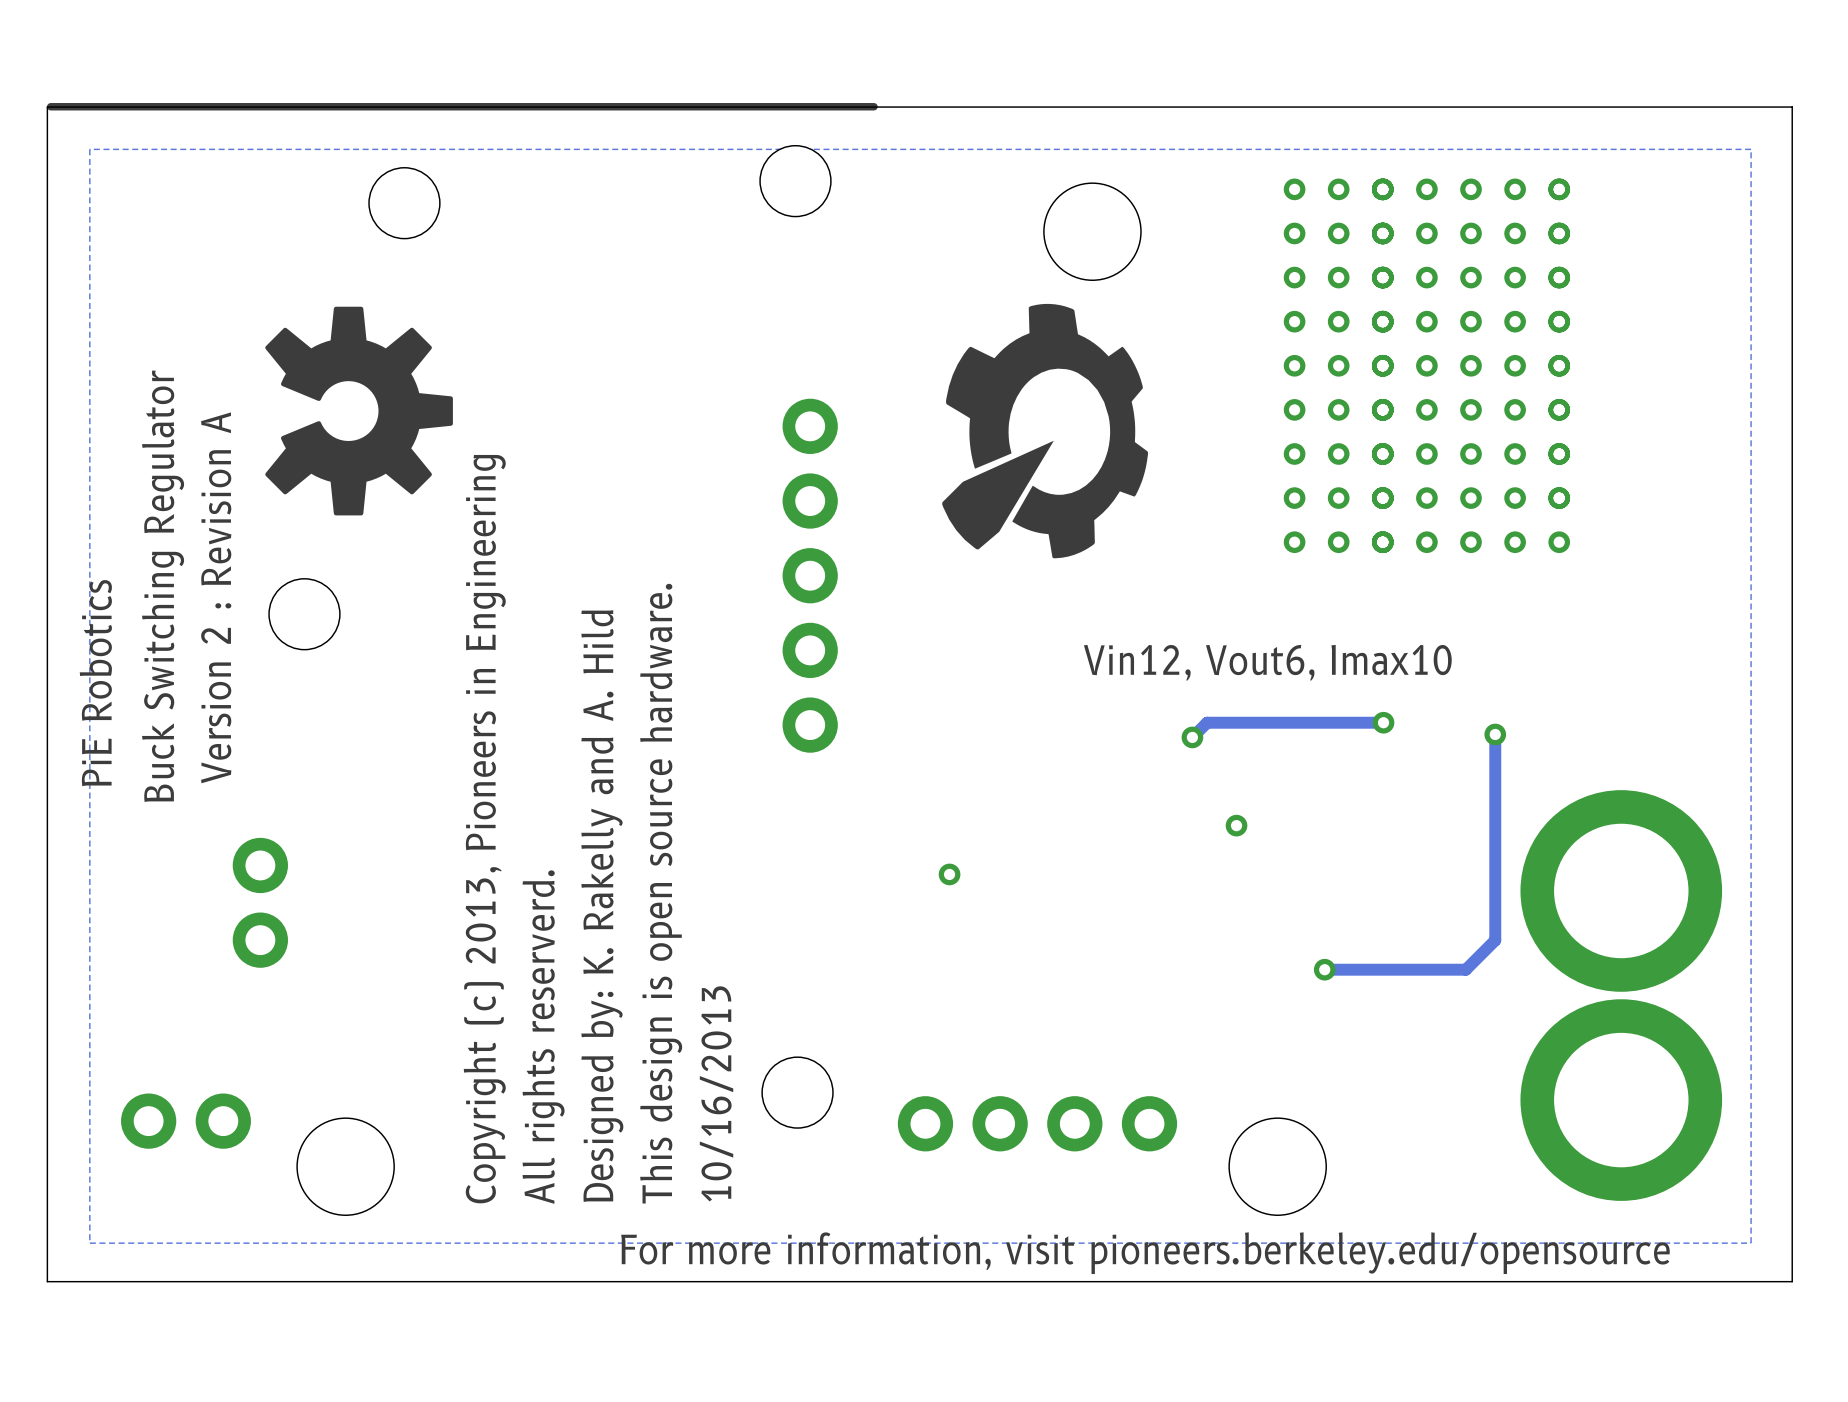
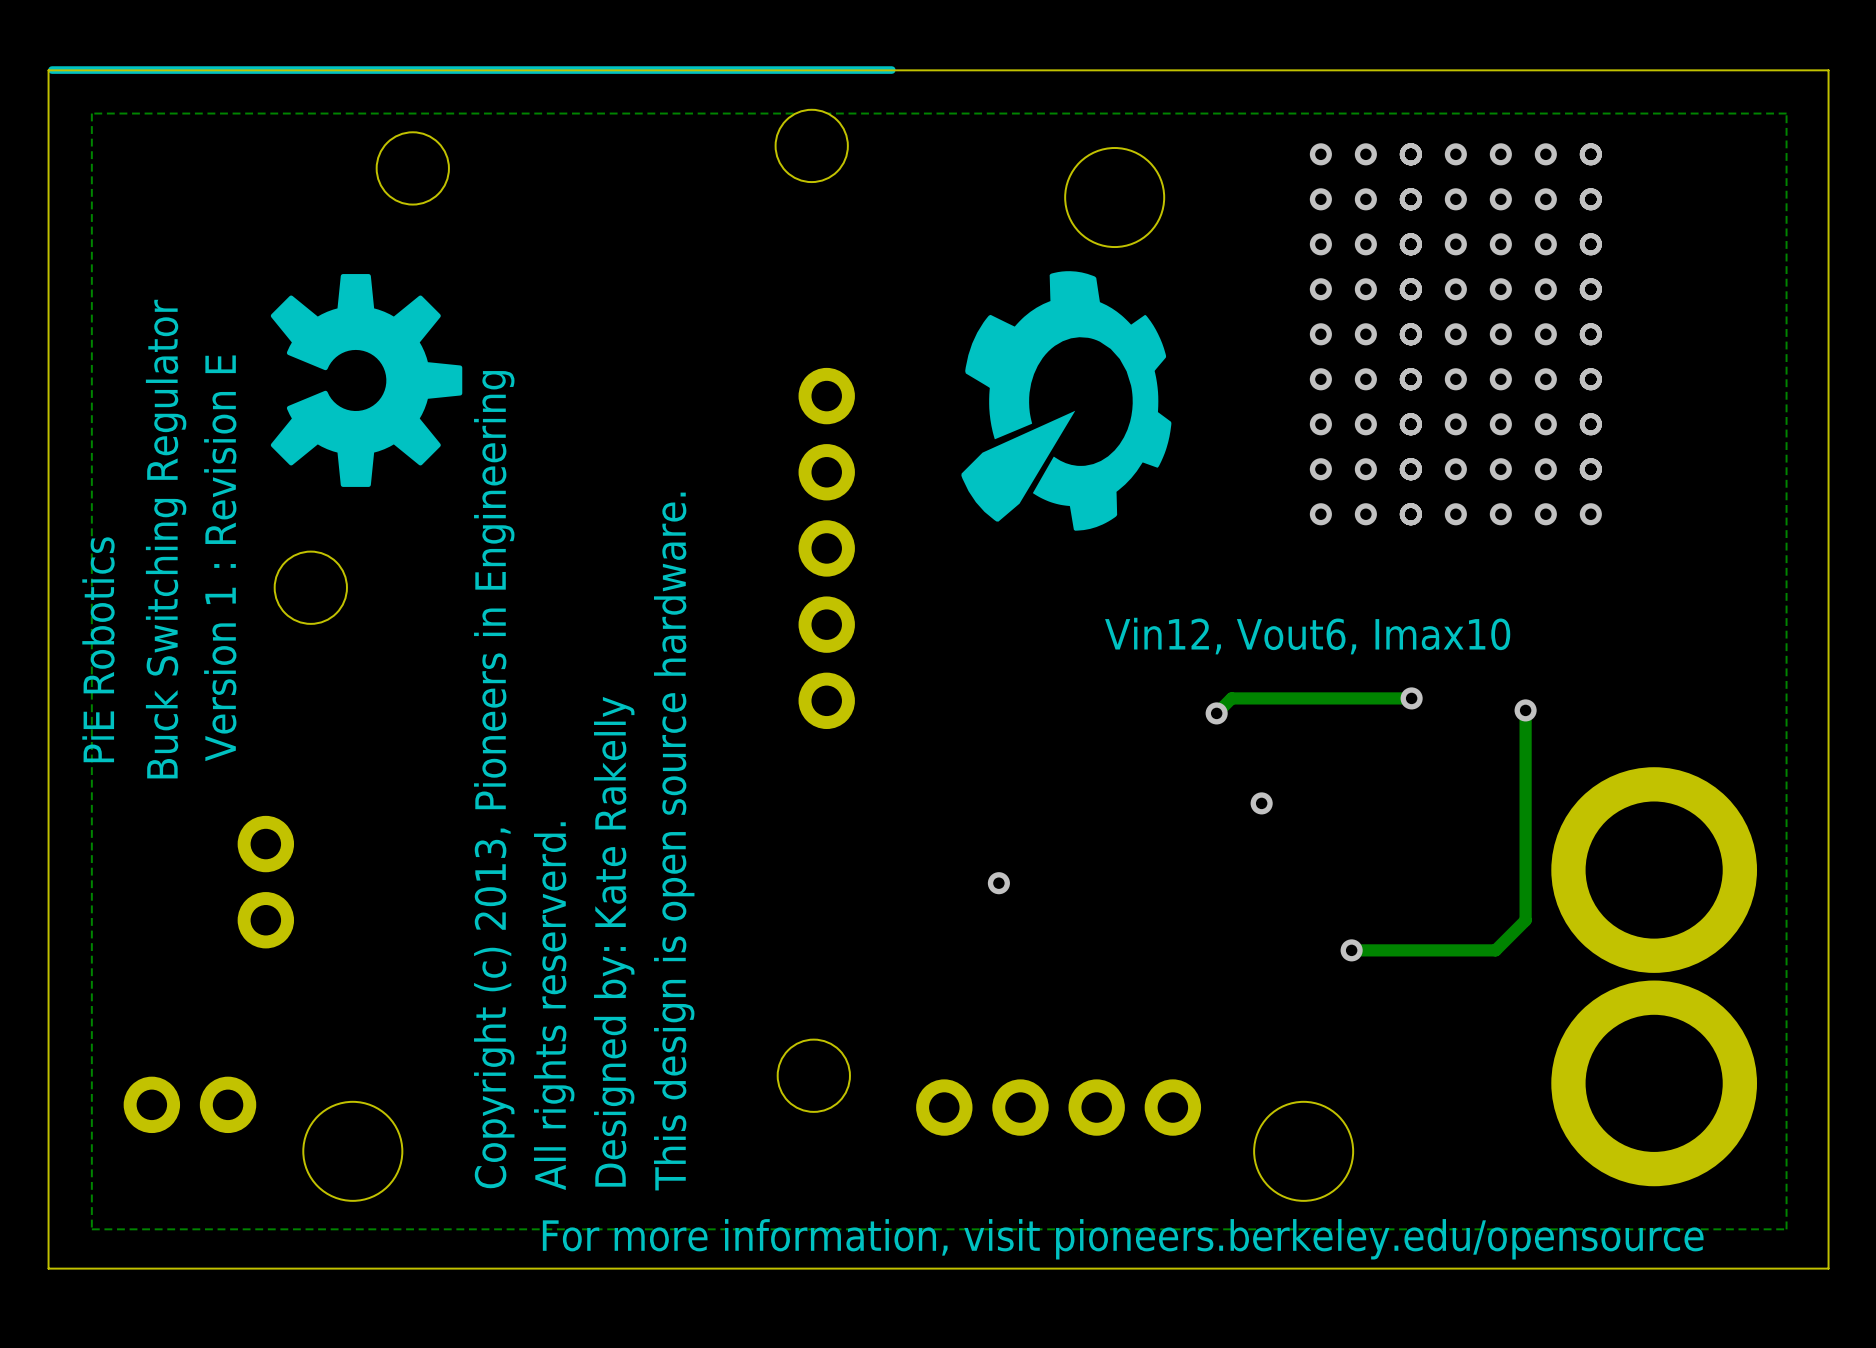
text: Version 2 : Revision A (216, 597) -> Version 1 : Revision E (220, 558)
via position: (949, 874) -> (998, 883)
text: Designed by: K. Rakelly and A. Hild (602, 906) -> Designed by: Kate Rakelly (614, 941)
text: 10/16/2013 (716, 1093) -> none

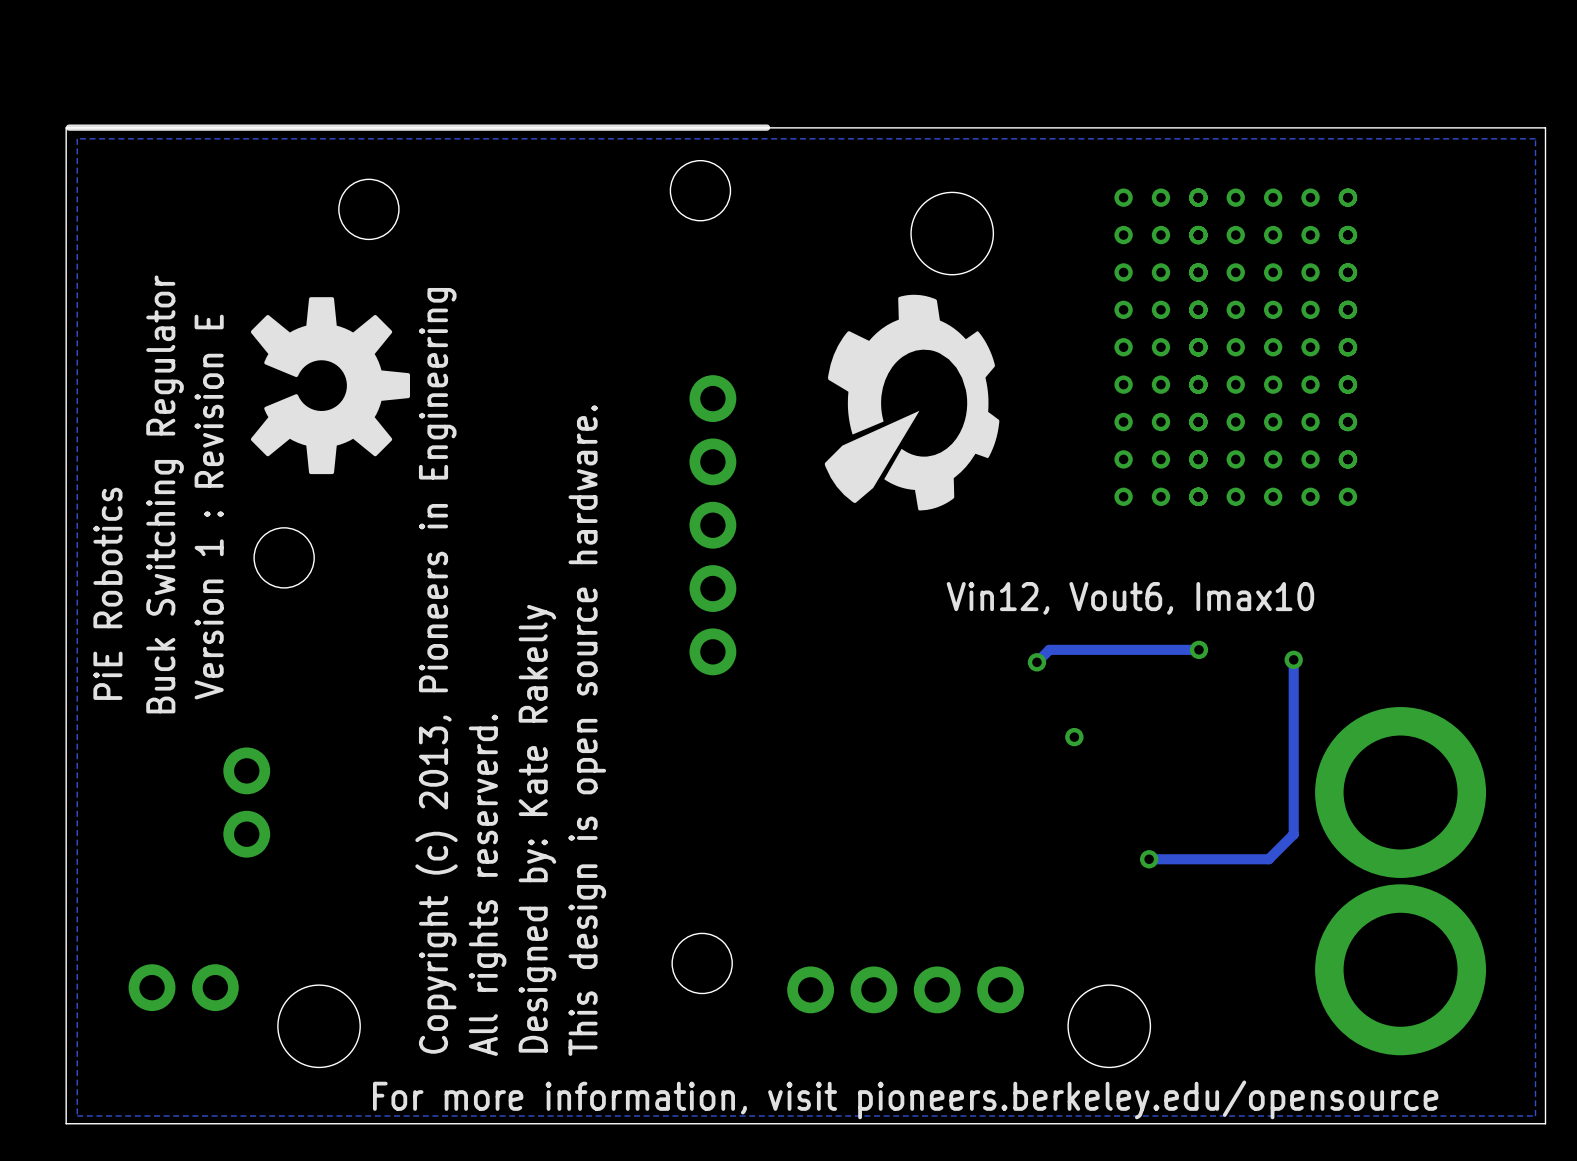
zone outline: (1786, 113) (91, 113) (91, 1229) (1786, 1229) (1786, 113) -> (1535, 138) (1535, 1116) (77, 1116) (77, 138) (1535, 138)
via: (998, 883) -> none

